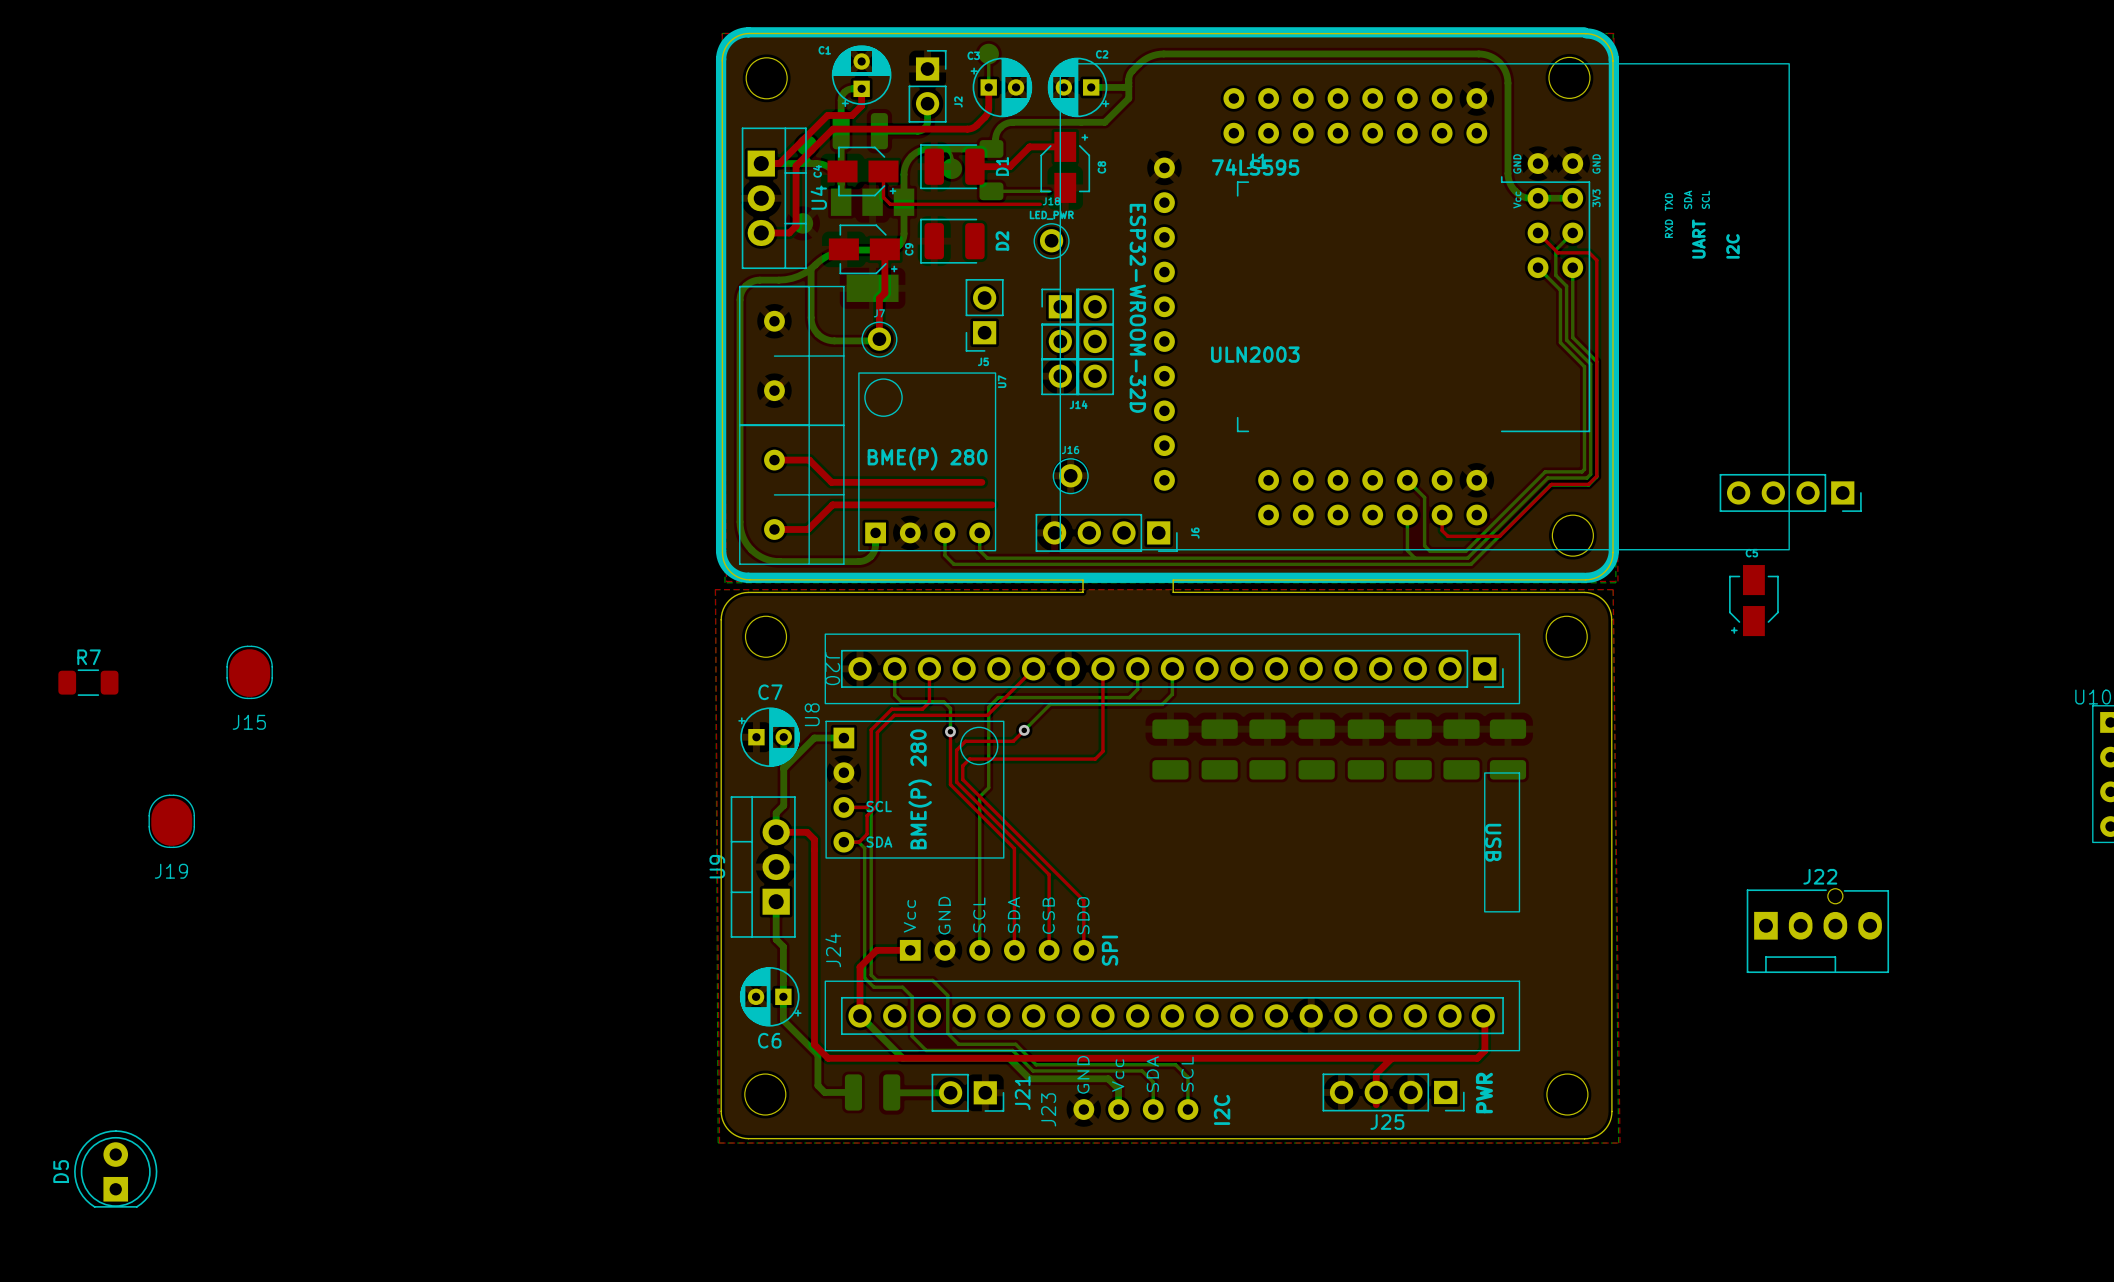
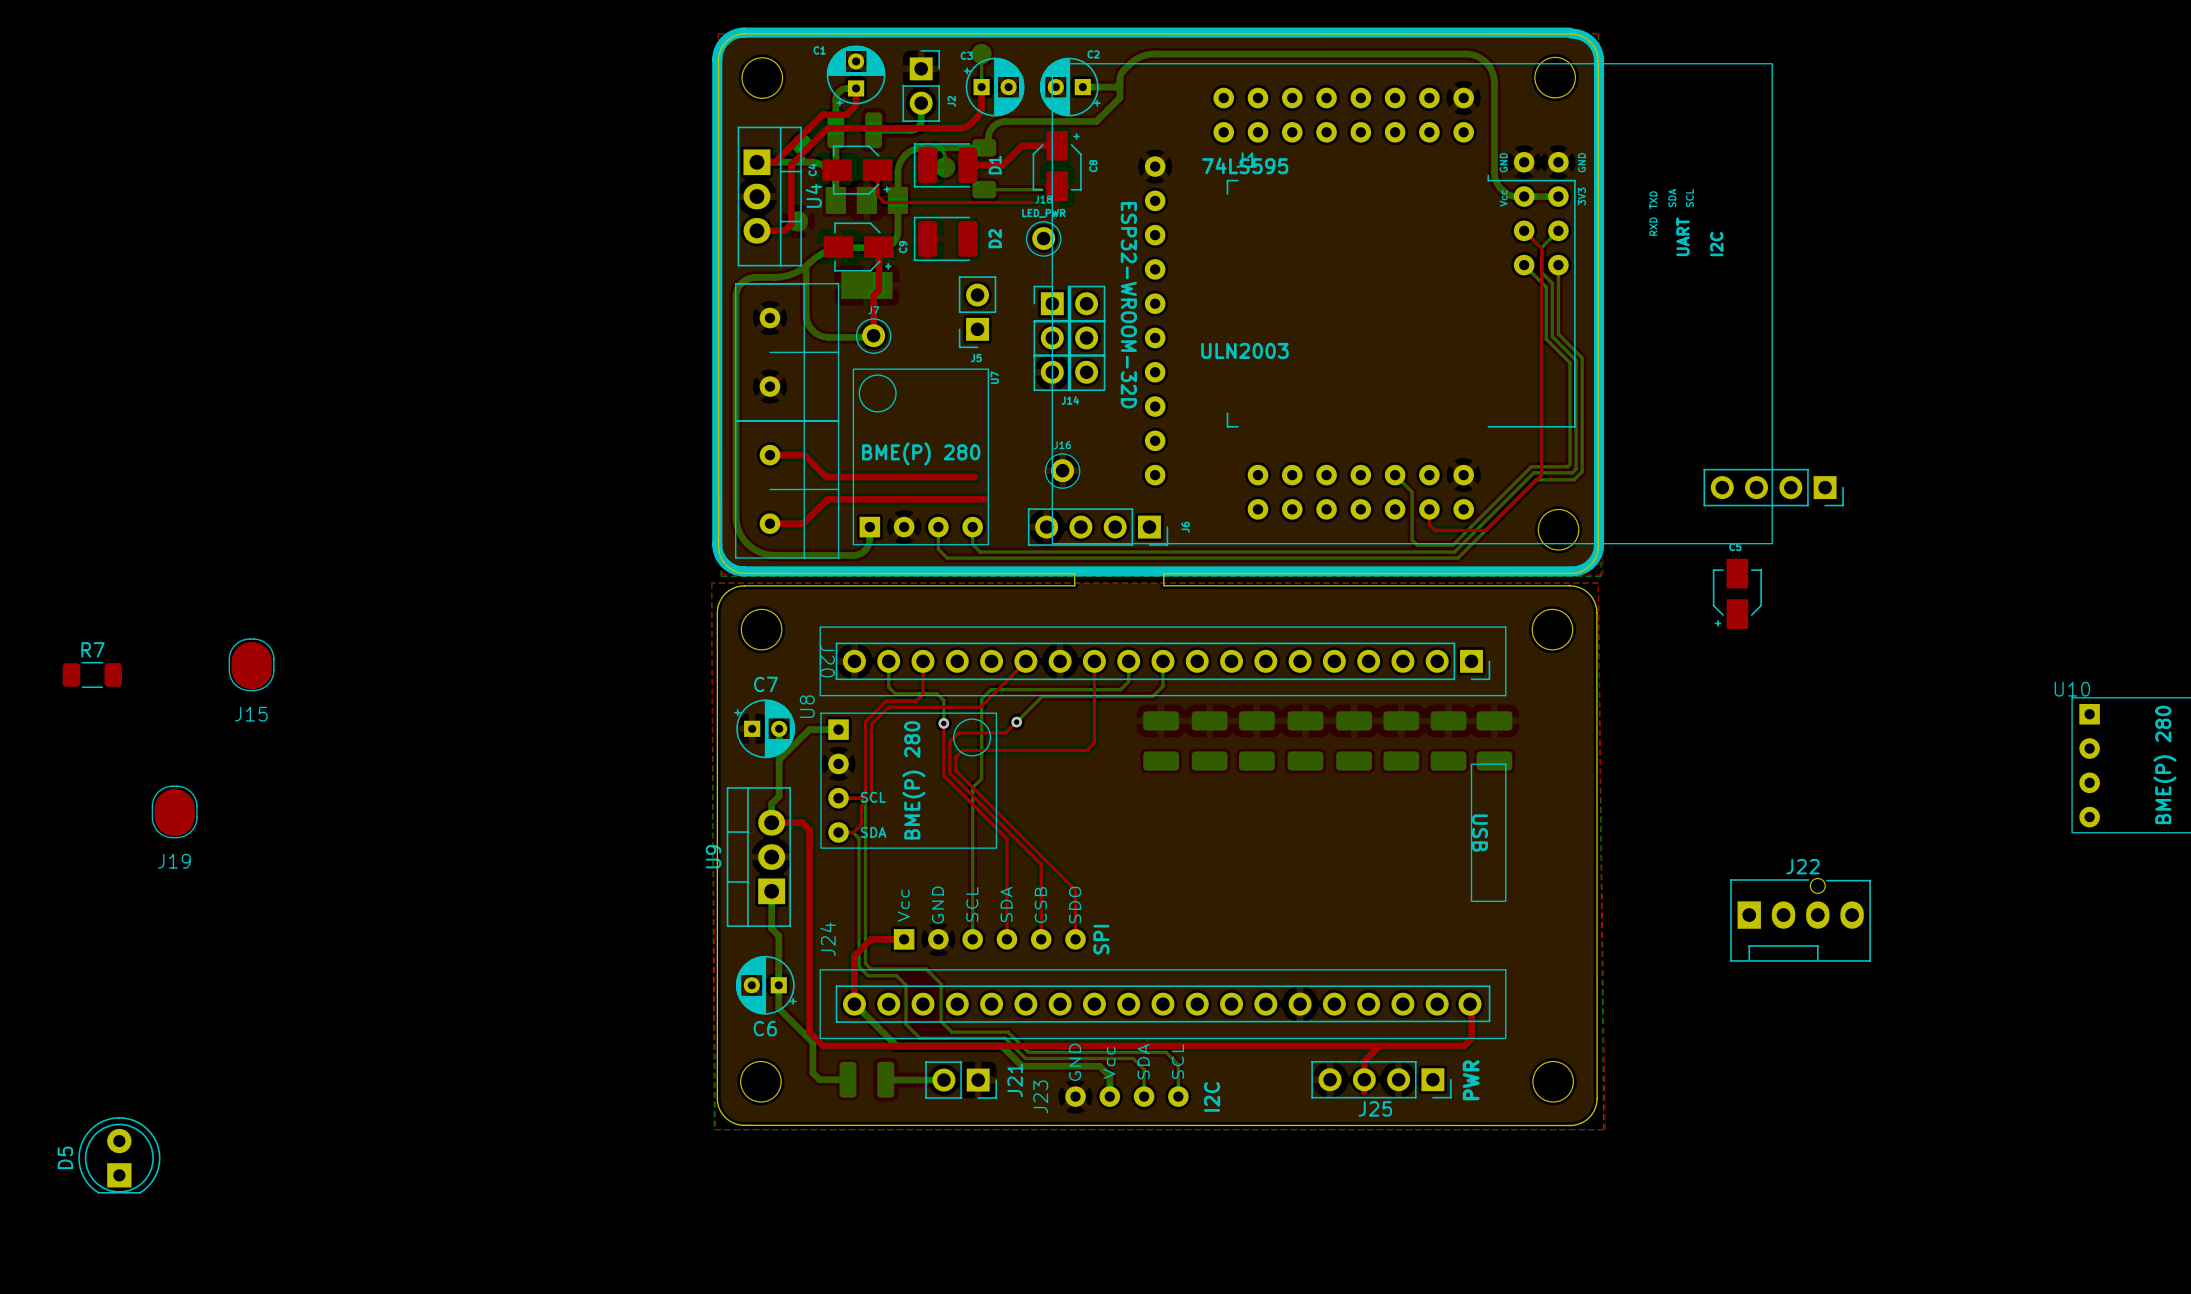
top track: (1555, 250) (1557, 252) (1589, 252) (1596, 260) (1596, 476) (1588, 484) (1551, 484) -> (1541, 248) (1541, 475) (1537, 479)
bottom track: (1407, 515) (1407, 550) (1415, 558) -> none

